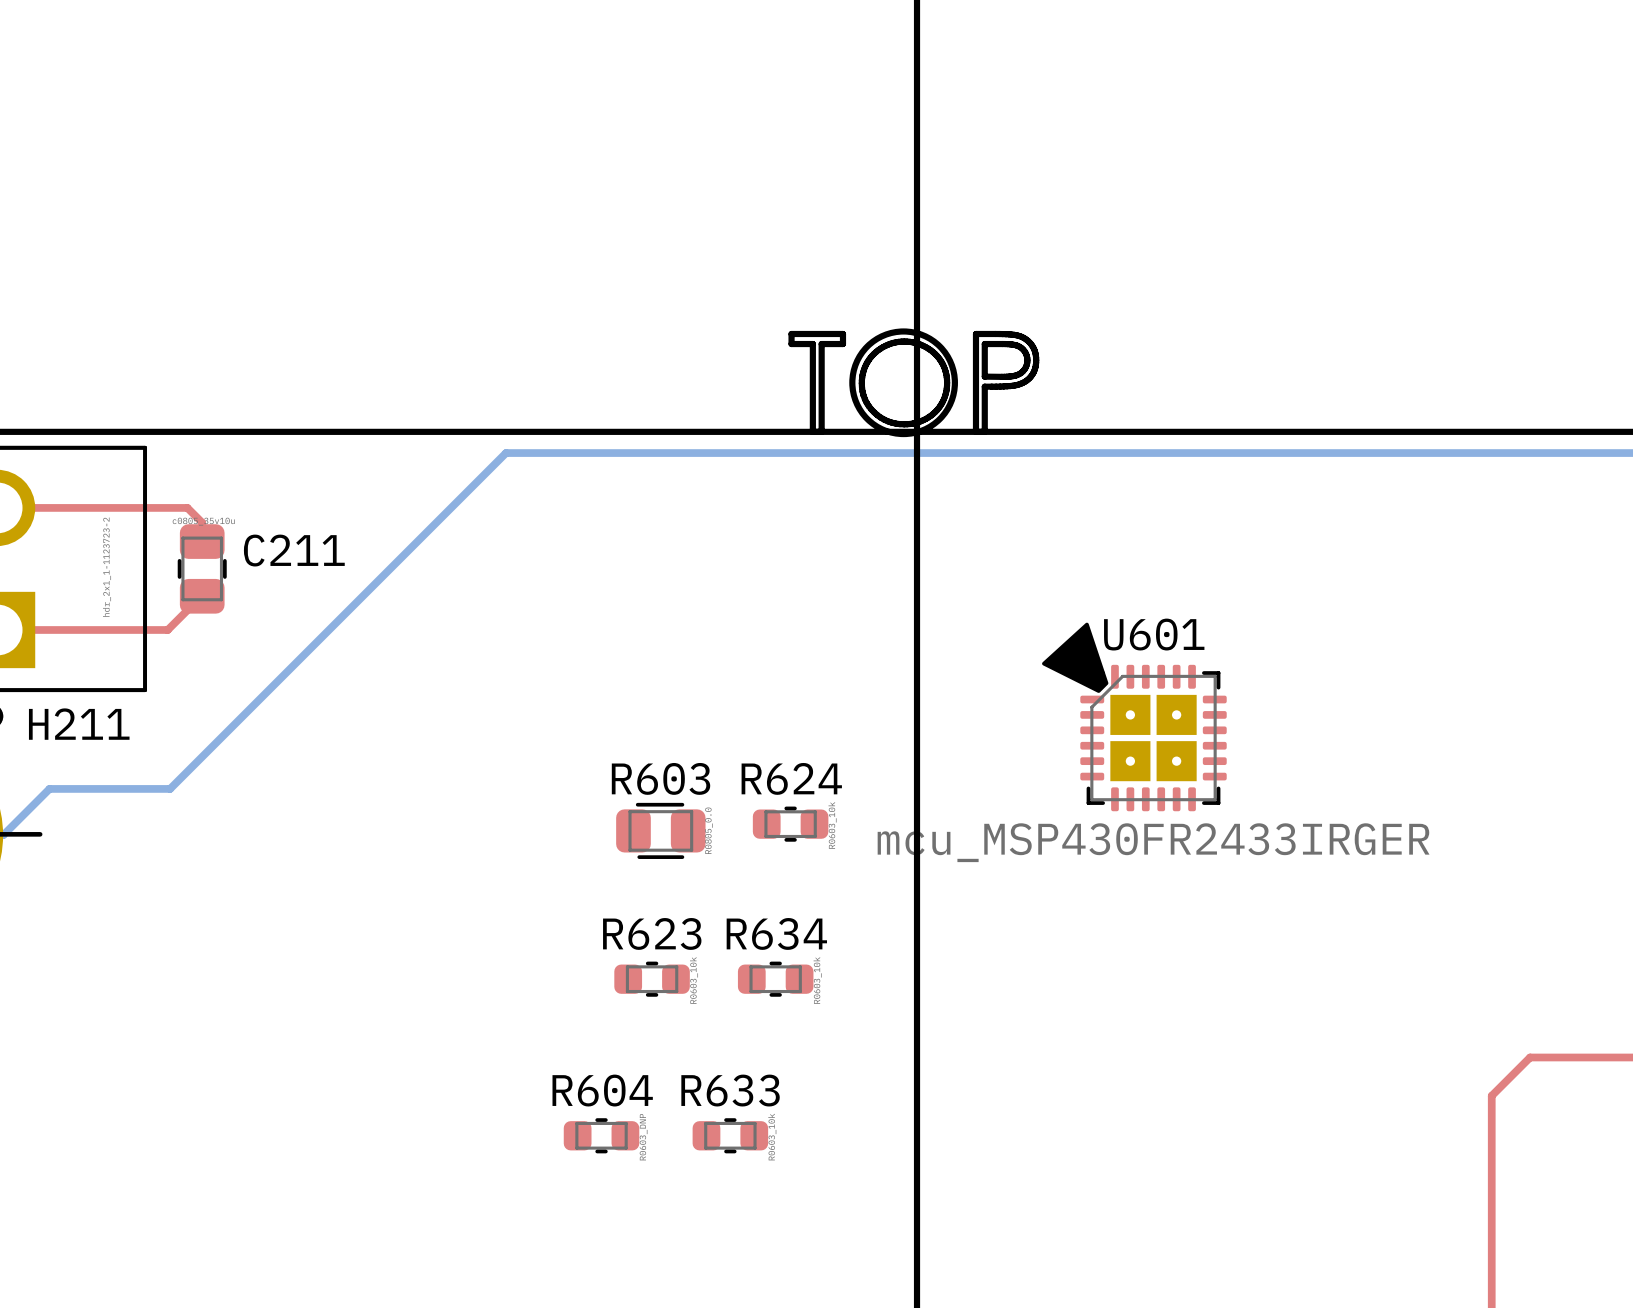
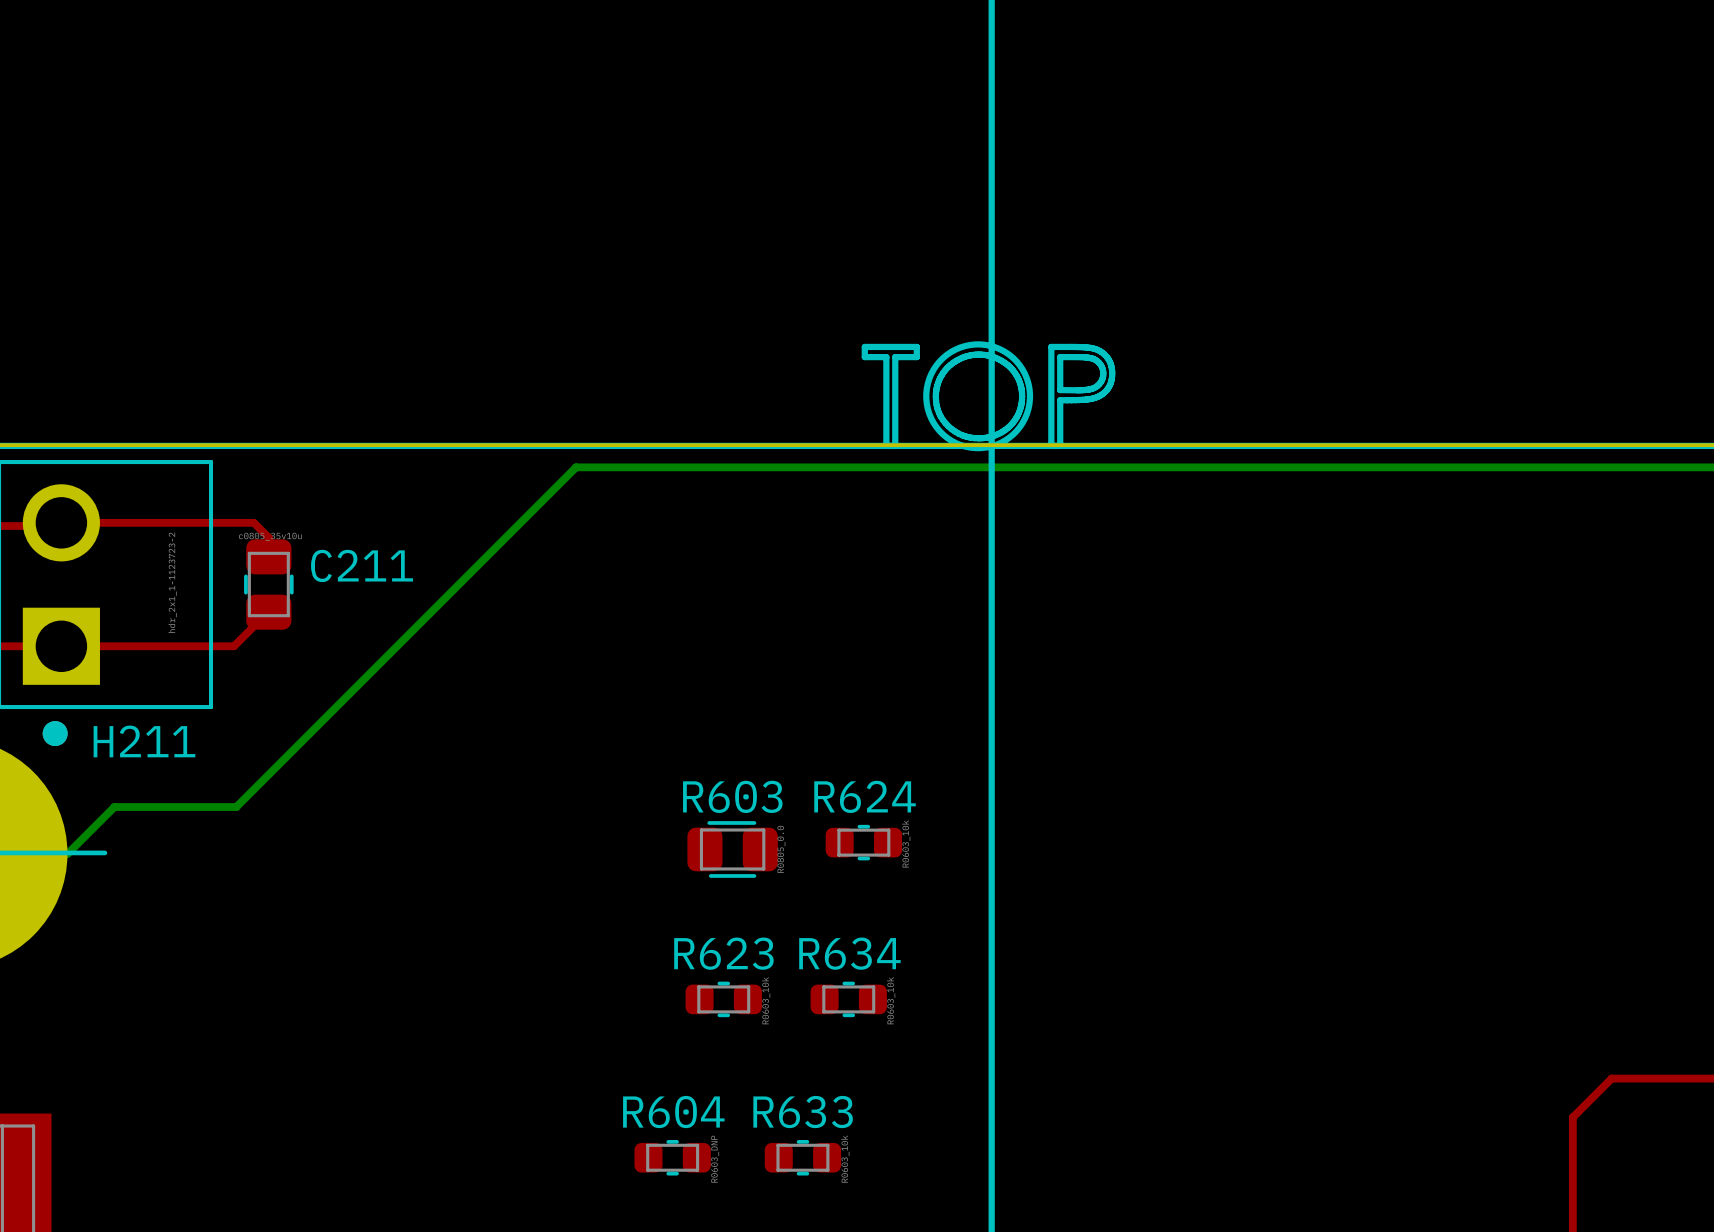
U601: mcu_MSP430FR2433IRGER (1134, 716) -> none

